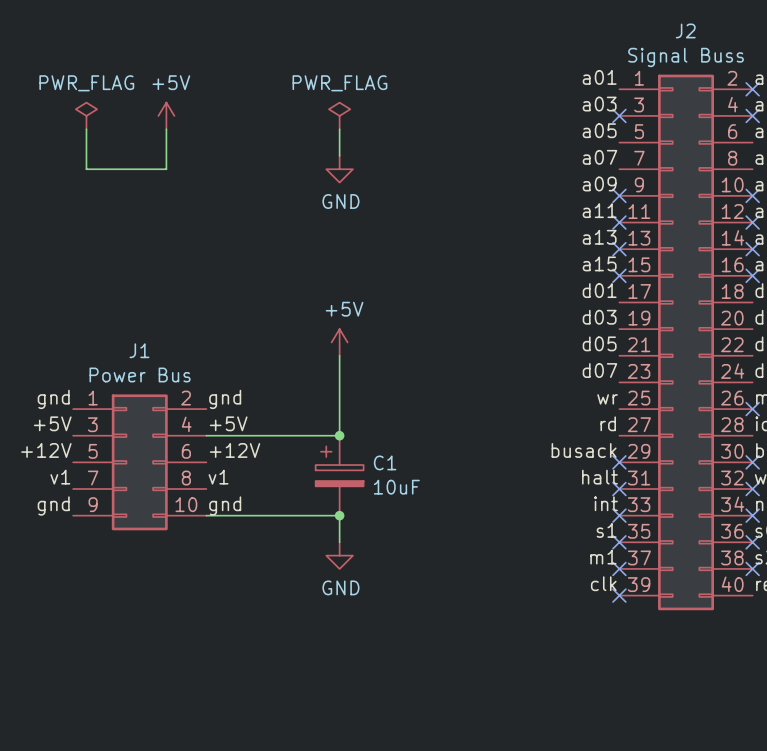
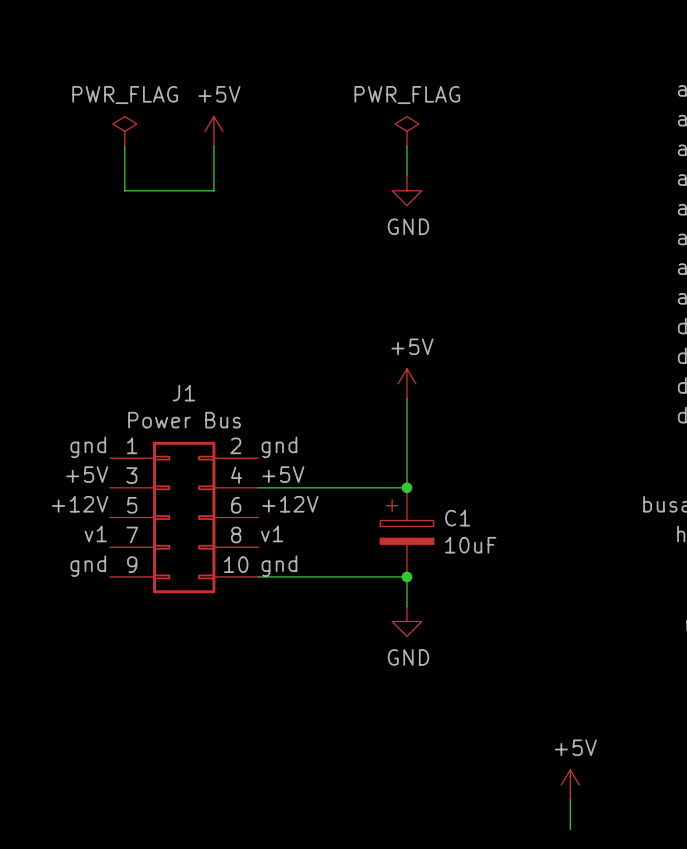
power symbol: none -> +5V (570, 784)
wire: none -> (570, 799) (570, 829)

